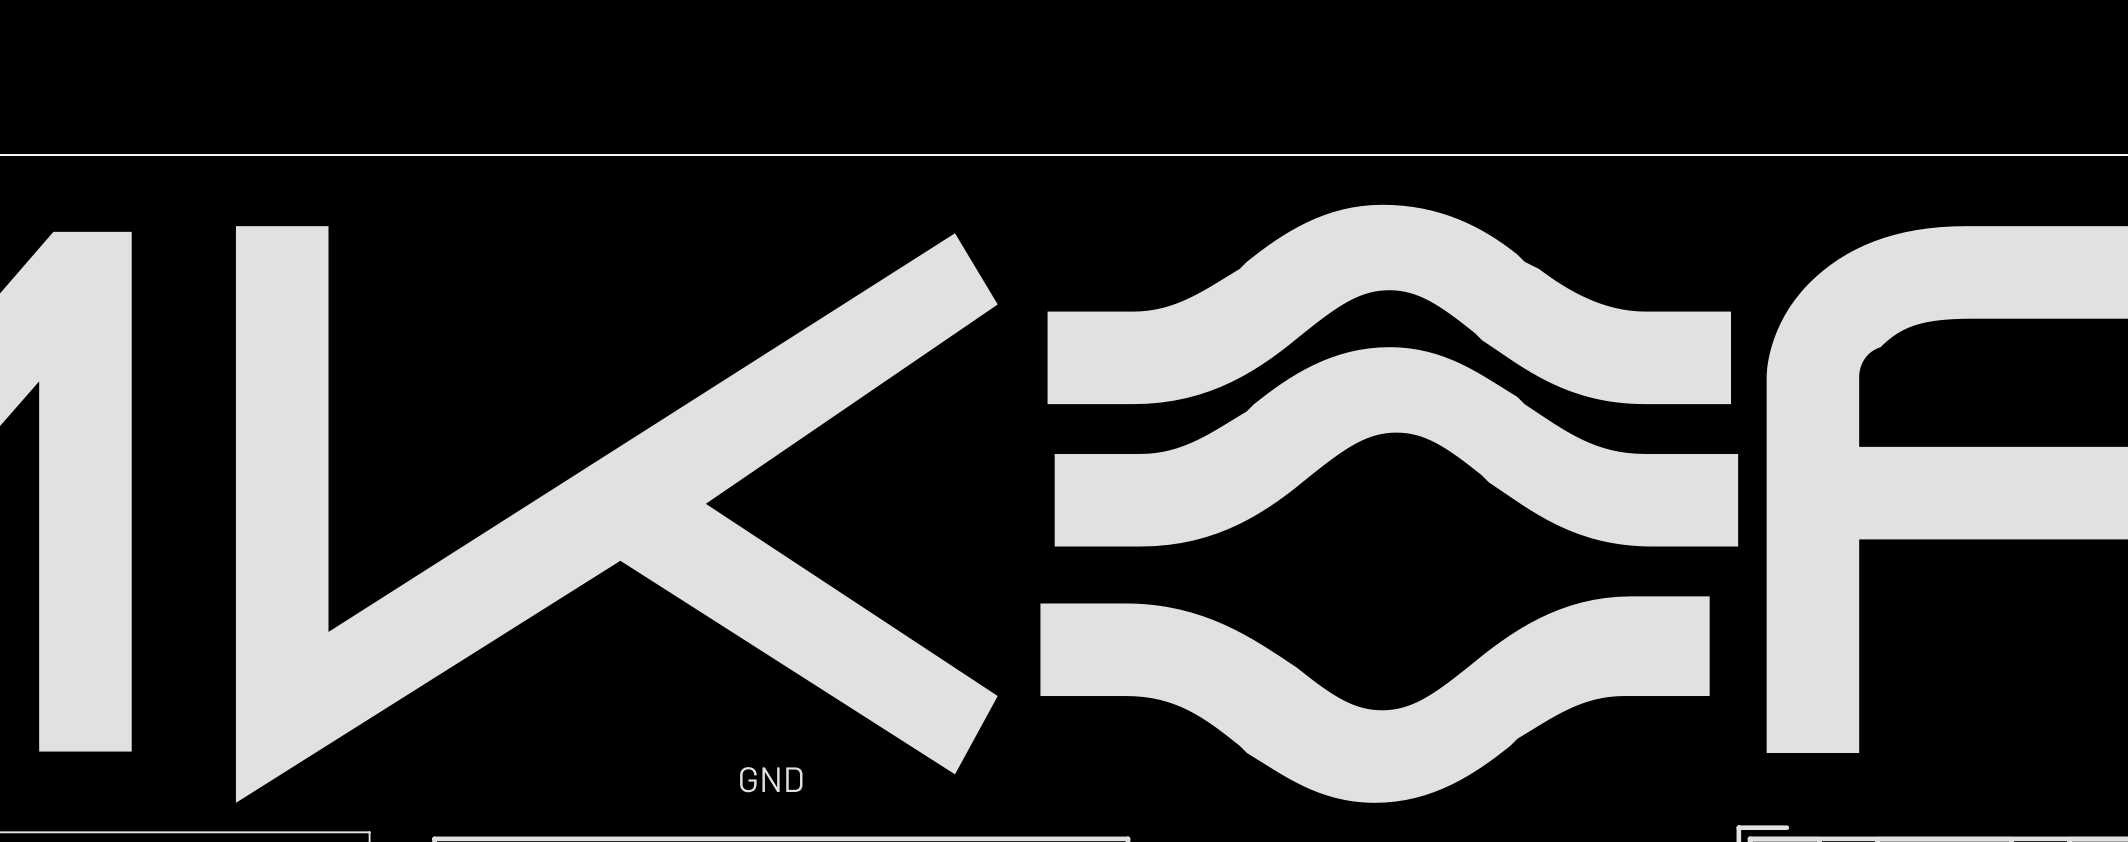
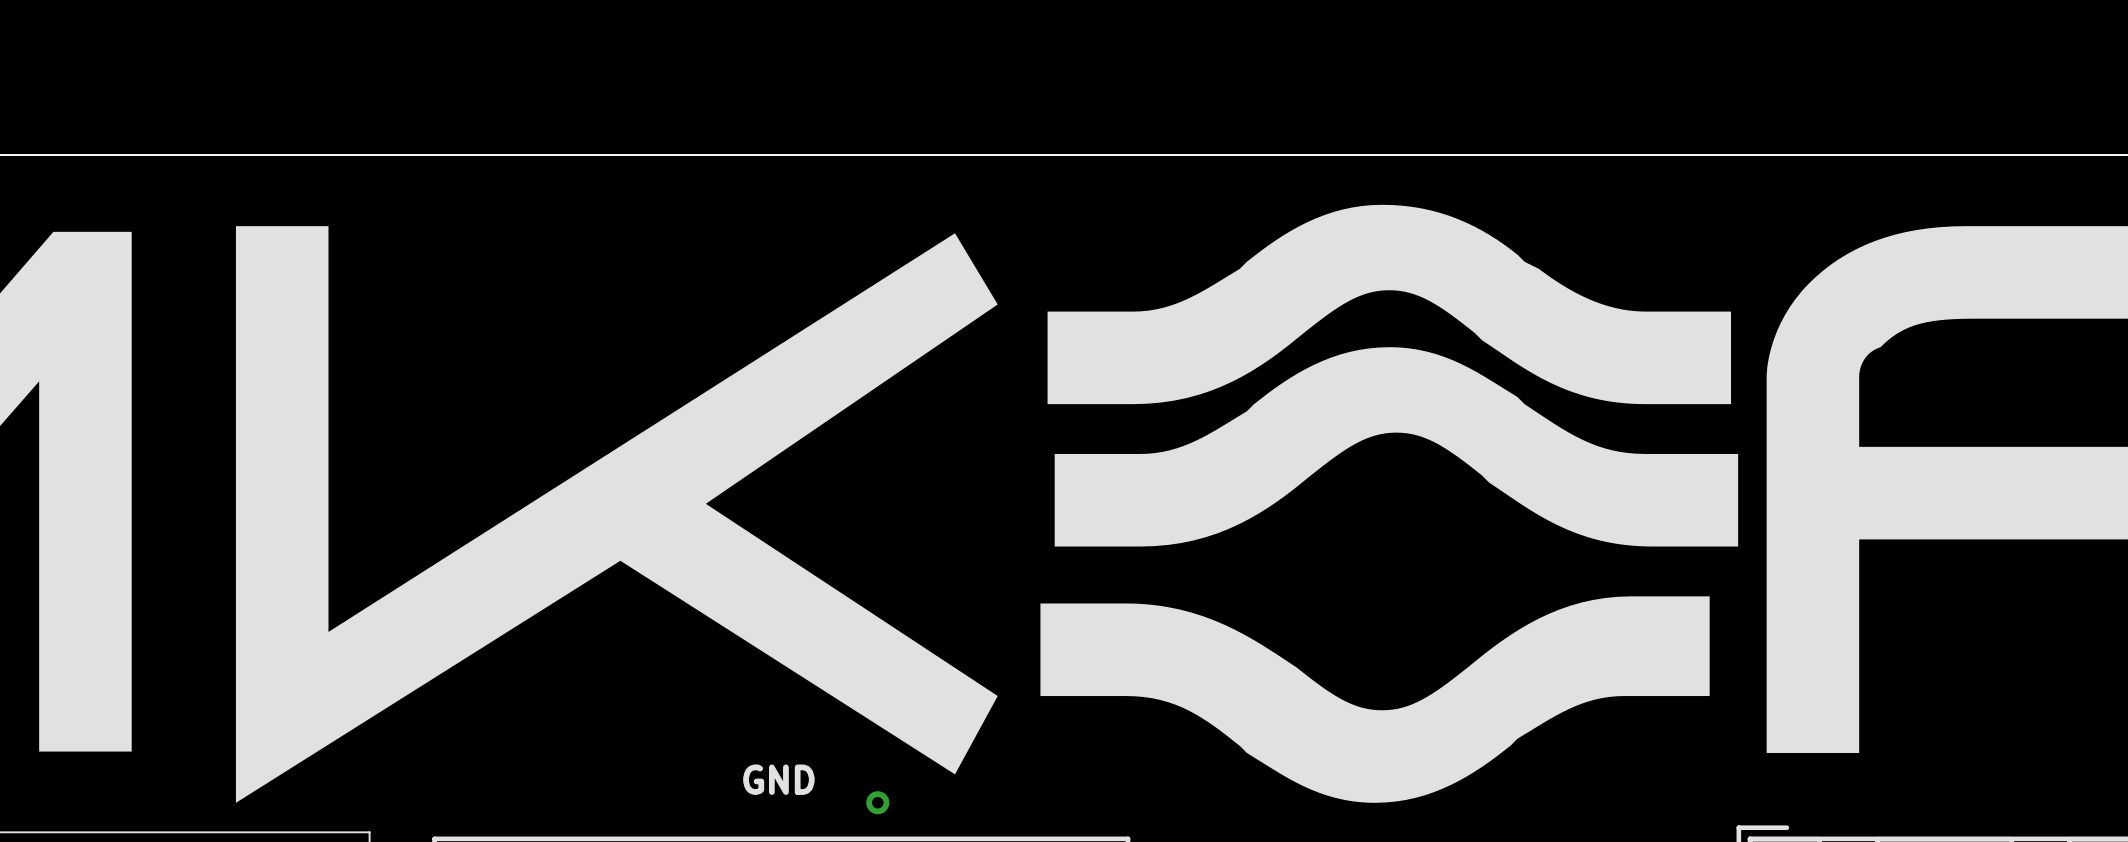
via: none -> (877, 802)

